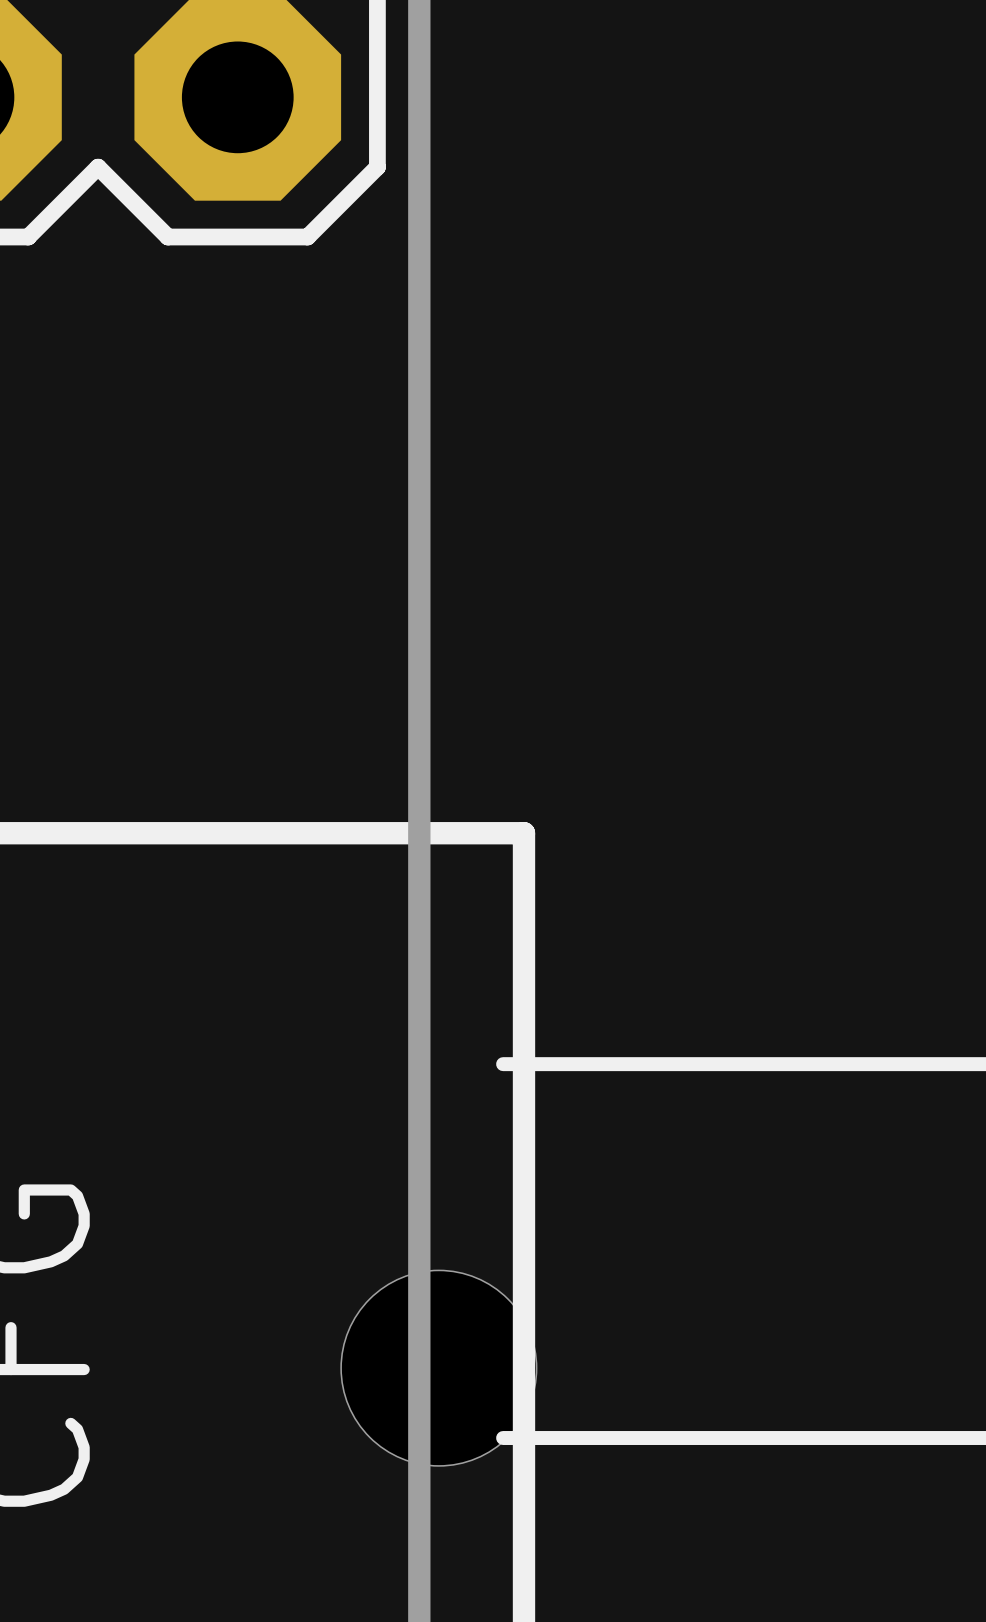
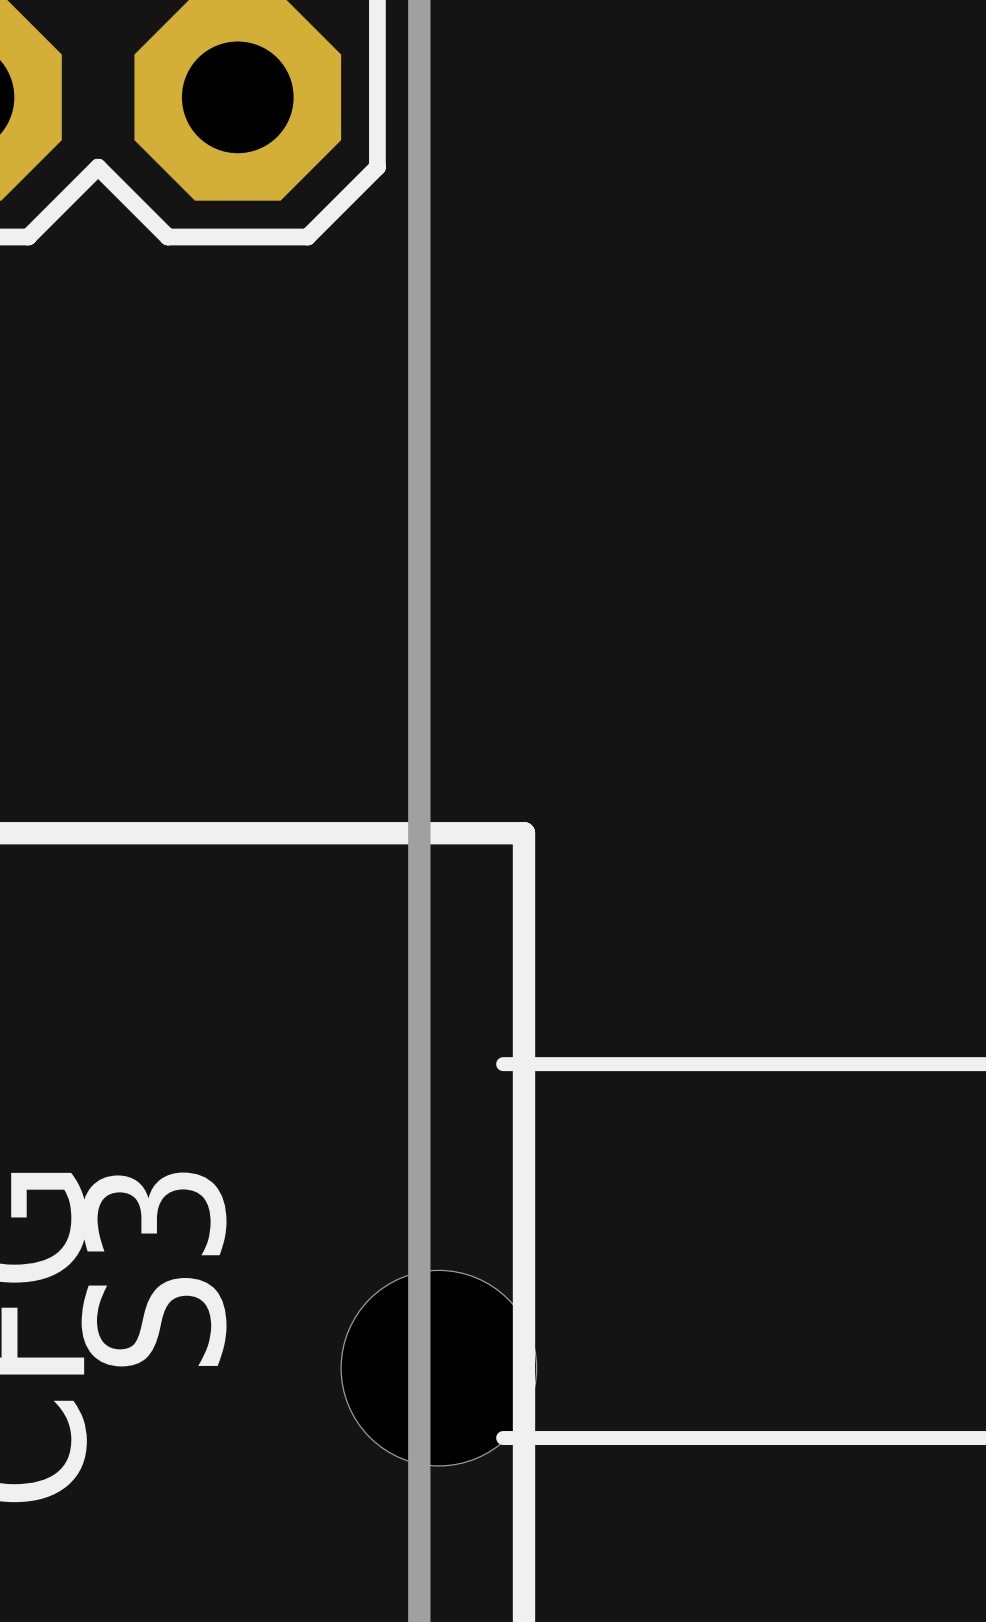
S3 name: none -> S3 (154, 1269)

